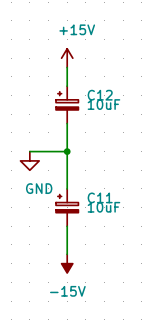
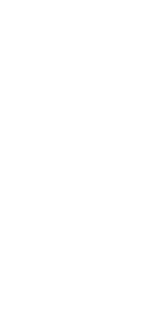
power symbol: +15V (67, 58) -> none
wire: (67, 67) (67, 86) -> none
C12: 10uF (67, 104) -> none
wire: (67, 123) (67, 188) -> none
wire: (29, 151) (67, 151) -> none
junction: (67, 151) -> none
power symbol: GND (29, 160) -> none
C11: 10uF (67, 207) -> none
wire: (67, 226) (67, 254) -> none
power symbol: -15V (67, 263) -> none

